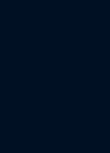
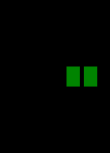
part: none -> (81, 76)

